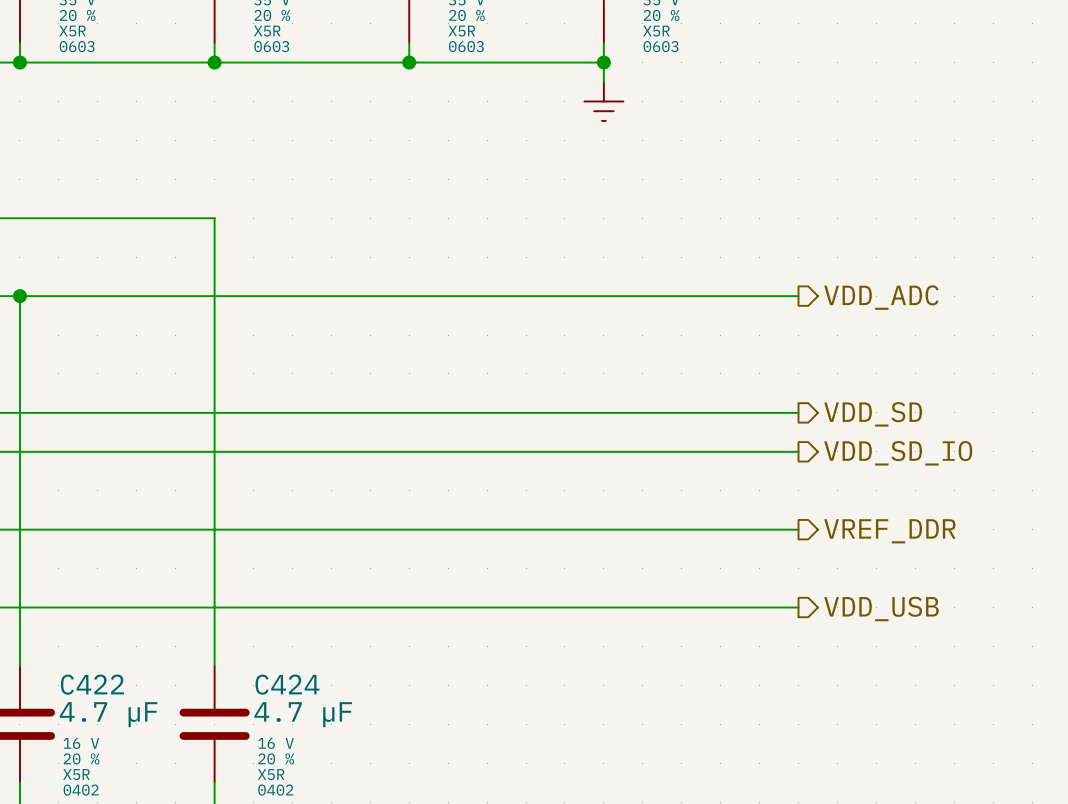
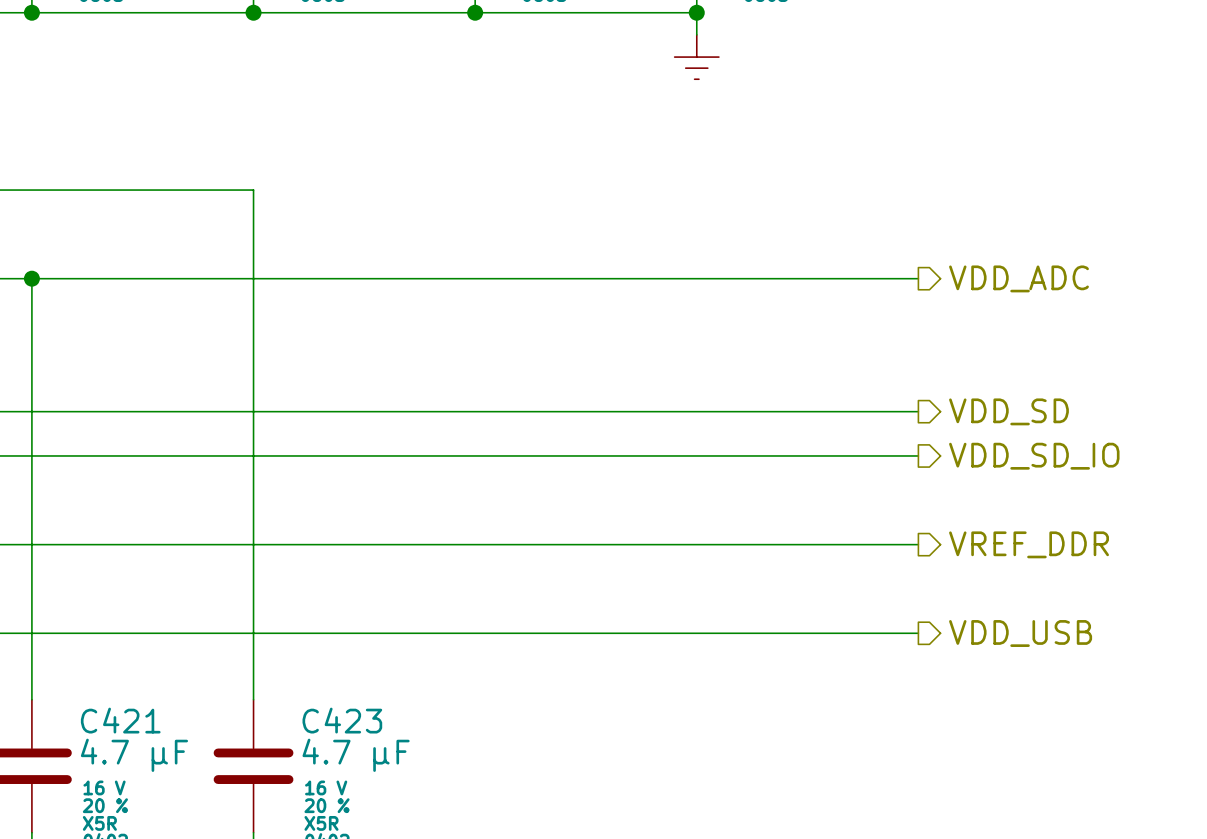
C422 name: C422 (92, 684) -> C421 (120, 720)
C424 name: C424 (287, 684) -> C423 (342, 720)

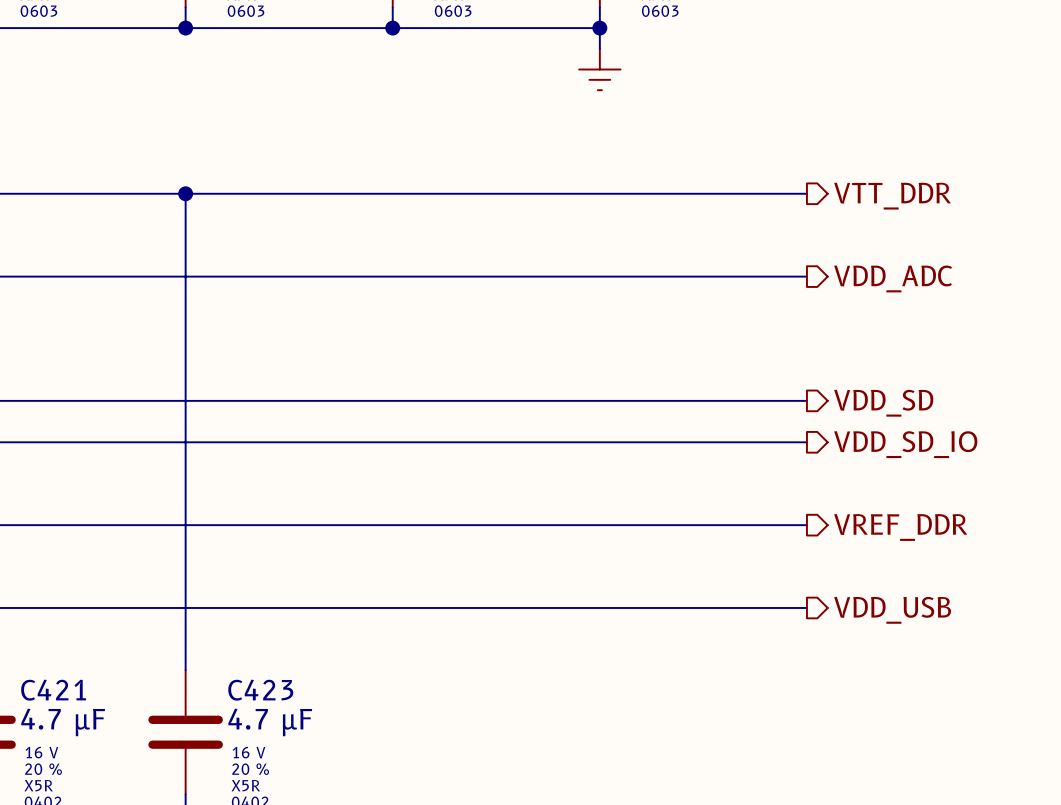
wire: none -> (185, 193) (806, 193)
junction: none -> (185, 193)
hierarchical label: none -> VTT_DDR (892, 196)

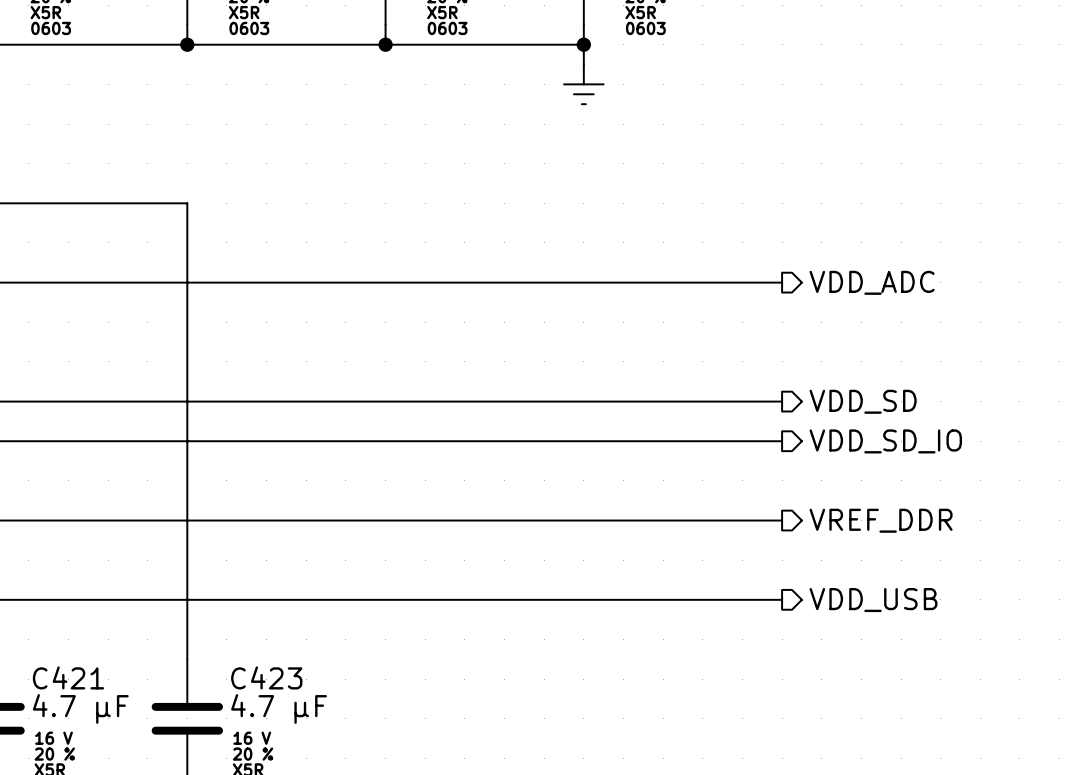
wire: (185, 193) (806, 193) -> none
junction: (185, 193) -> none
hierarchical label: VTT_DDR (892, 196) -> none

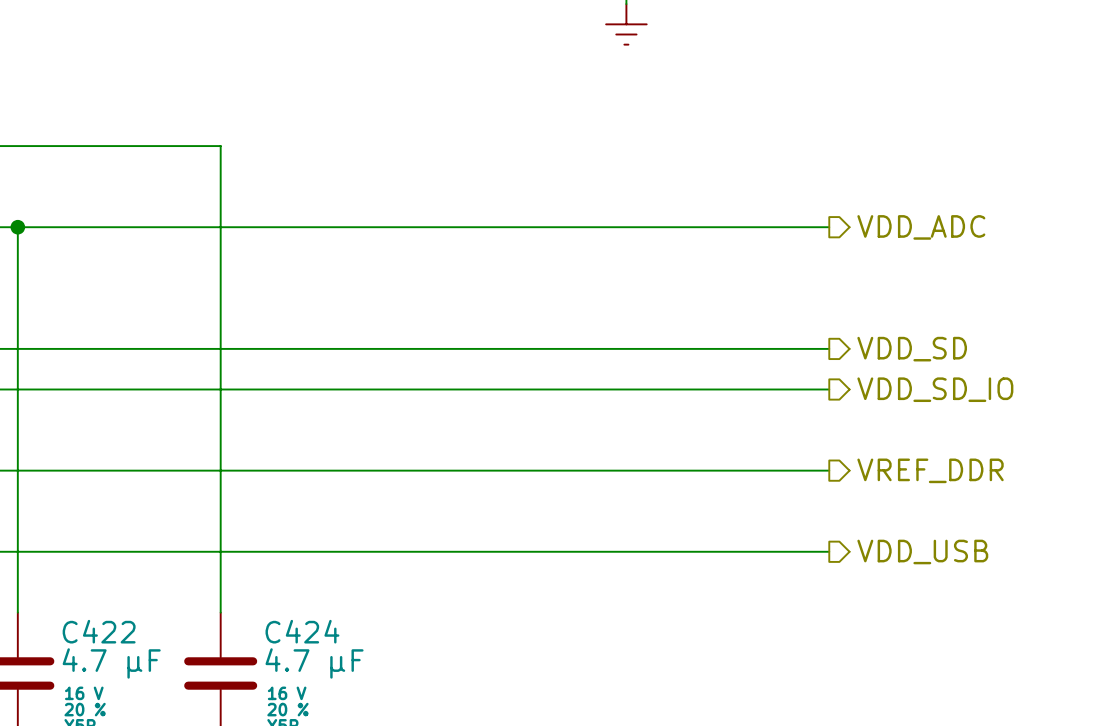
C421 name: C421 (68, 677) -> C422 (99, 631)
C423 name: C423 (266, 677) -> C424 (302, 631)

